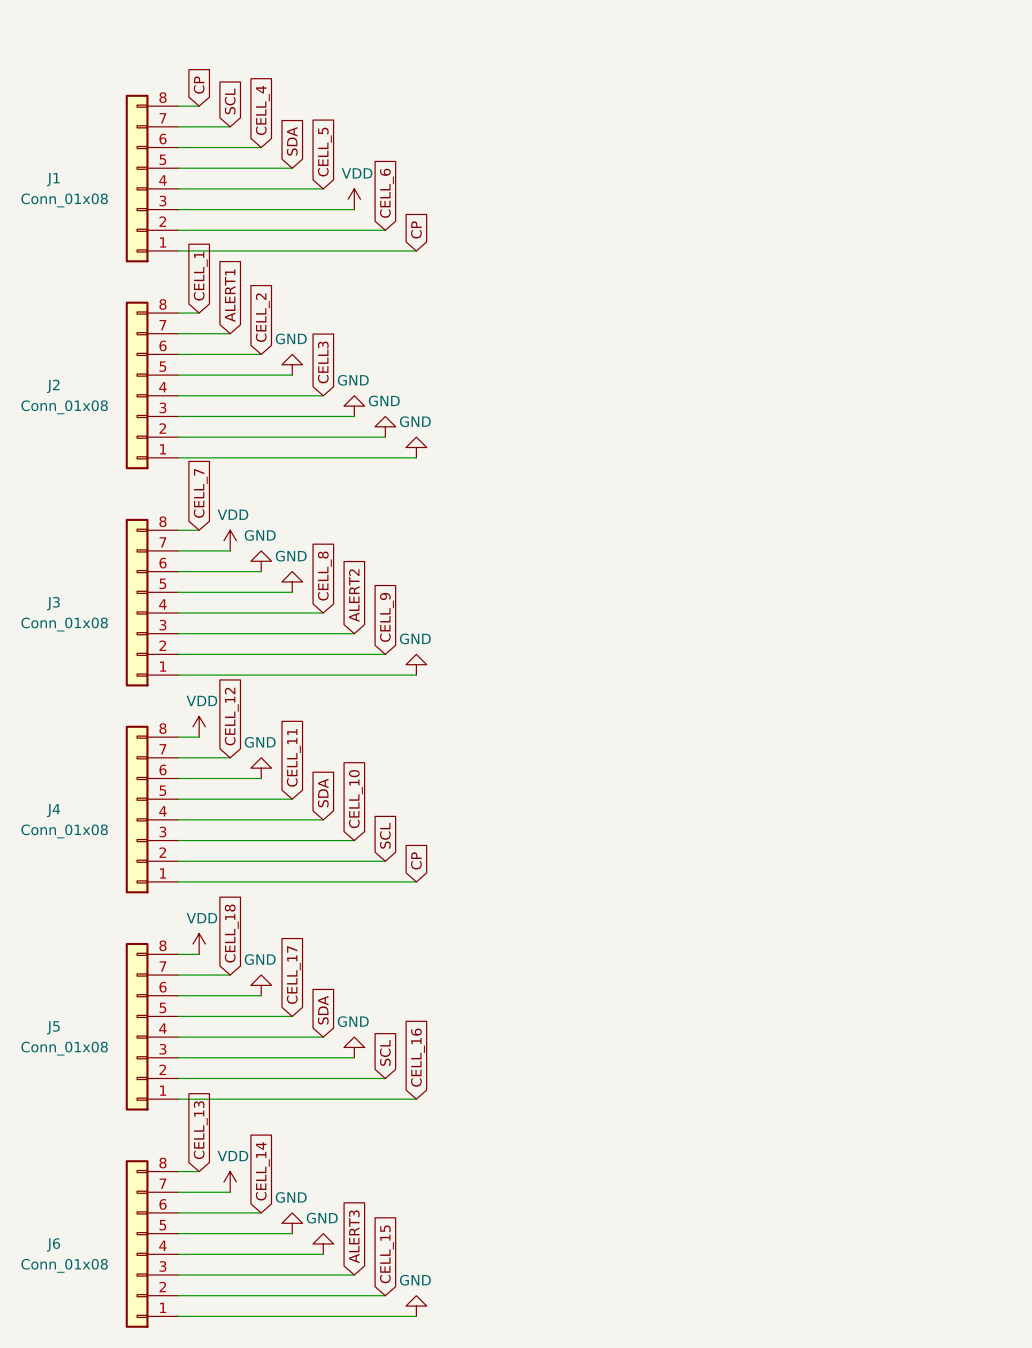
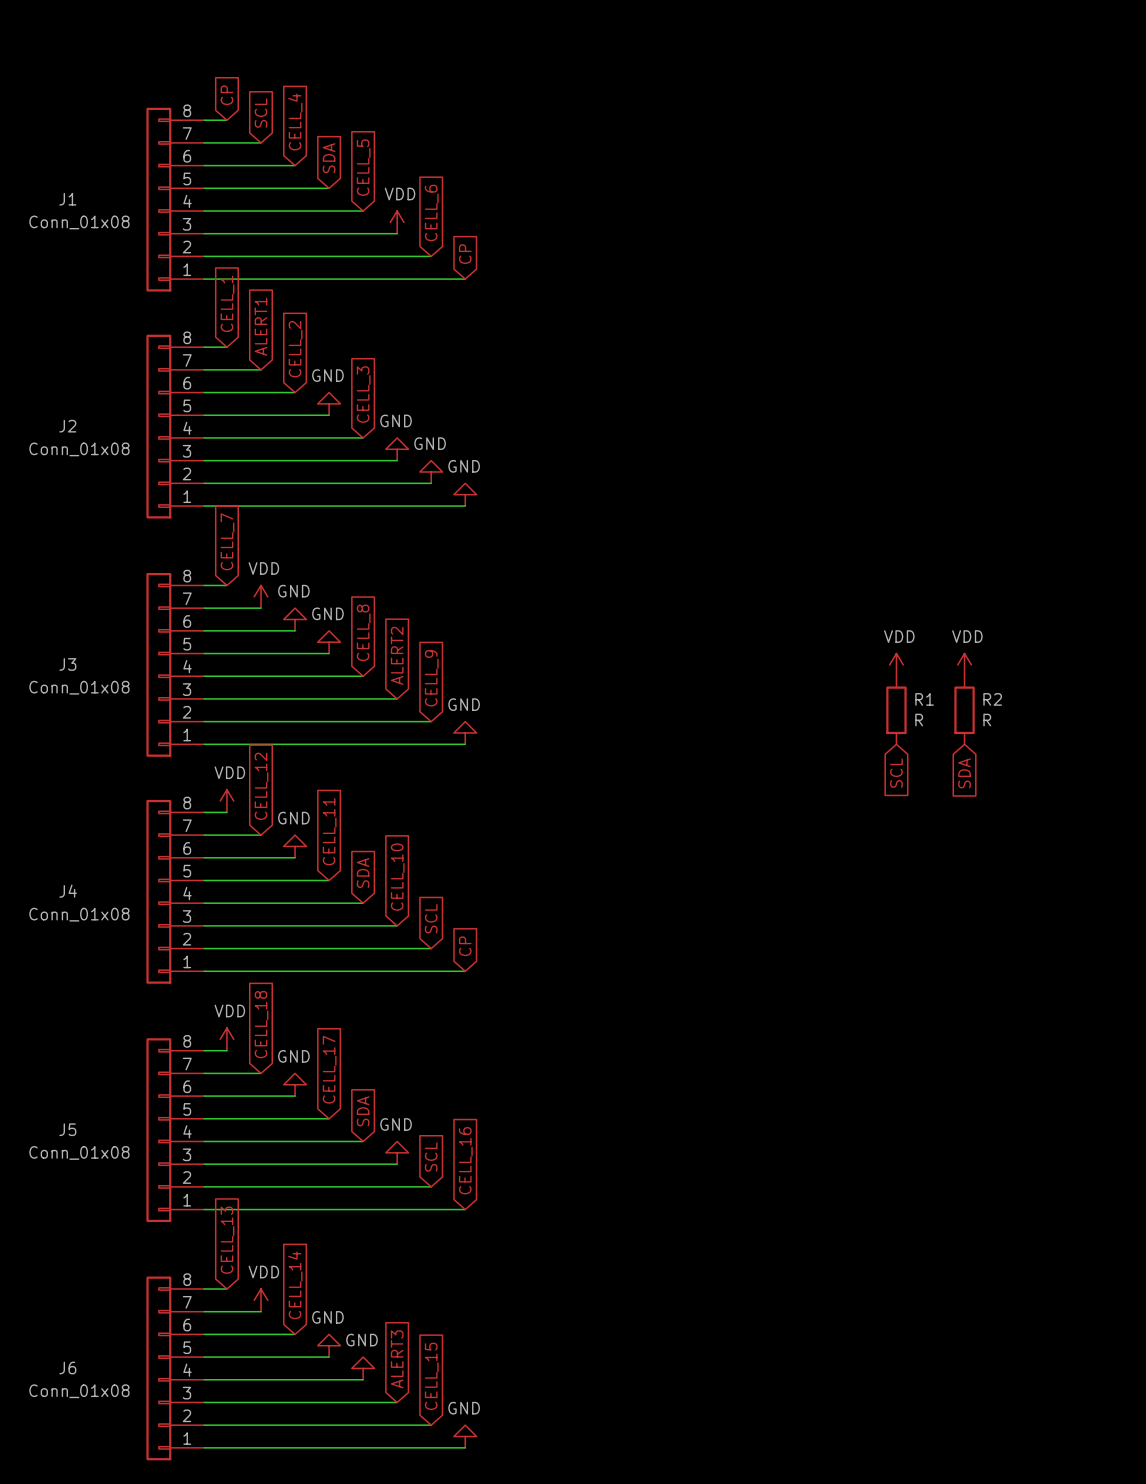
global label: CELL3 (323, 362) -> CELL_3 (363, 394)
power symbol: none -> VDD (896, 664)
power symbol: none -> VDD (964, 664)
R1: none -> R (896, 710)
R2: none -> R (964, 710)
global label: none -> SCL (896, 773)
global label: none -> SDA (964, 773)

